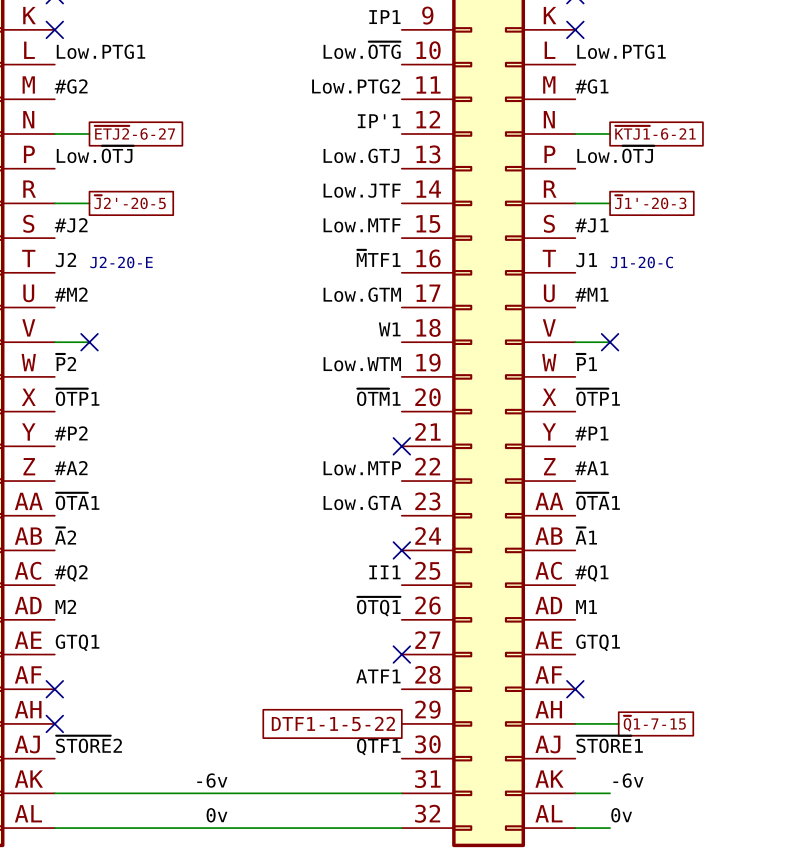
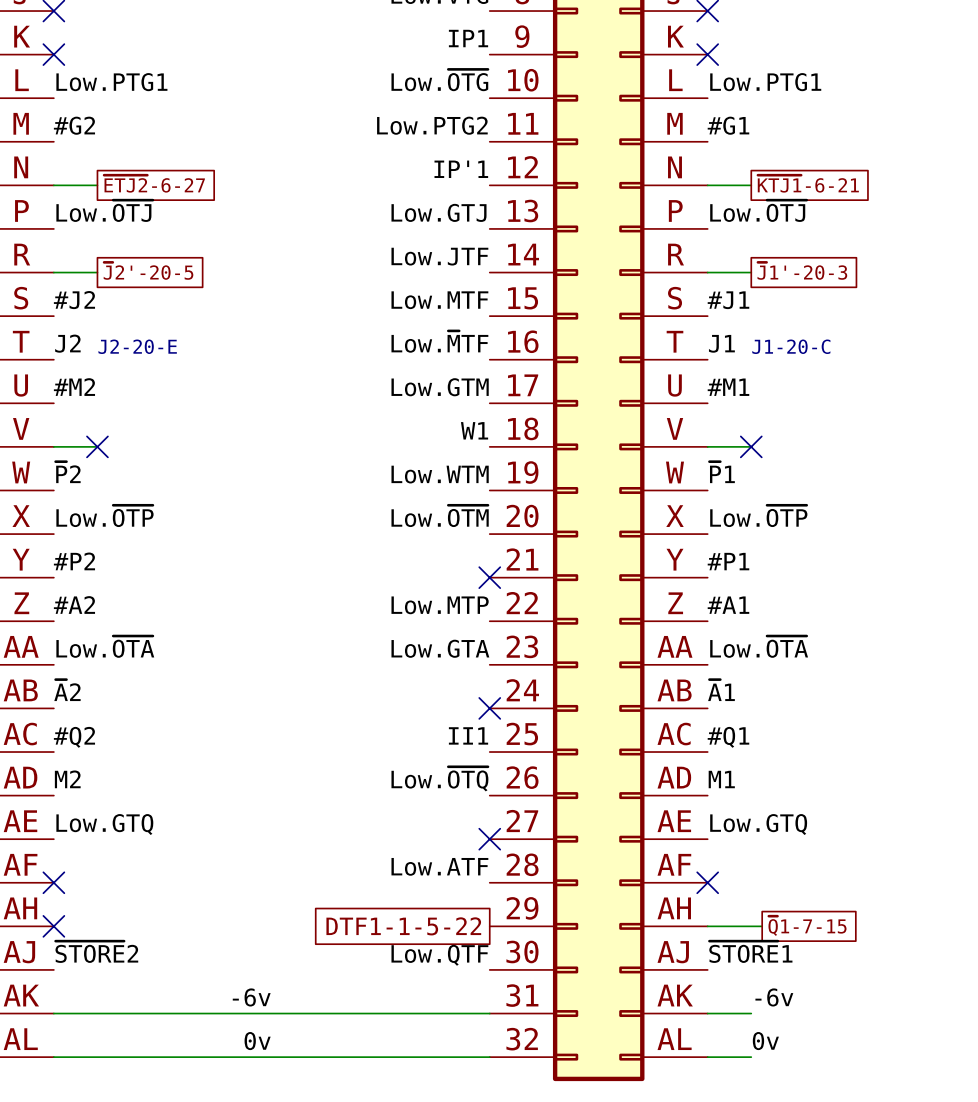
label: ~{M}TF1 (378, 258) -> Low.~{M}TF (439, 341)
label: ~{OTP}1 (77, 397) -> Low.~{OTP} (104, 516)
label: ~{OTM}1 (378, 397) -> Low.~{OTM} (440, 516)
label: ~{OTP}1 (598, 397) -> Low.~{OTP} (758, 516)
label: ~{OTA}1 (77, 501) -> Low.~{OTA} (105, 646)
label: ~{OTA}1 (598, 501) -> Low.~{OTA} (759, 646)
label: ~{OTQ1} (378, 606) -> Low.~{OTQ} (439, 779)
label: GTQ1 (77, 642) -> Low.GTQ (104, 824)
label: GTQ1 (598, 642) -> Low.GTQ (758, 824)
label: ATF1 (378, 676) -> Low.ATF (439, 866)
label: QTF1 (378, 746) -> Low.QTF (439, 955)

